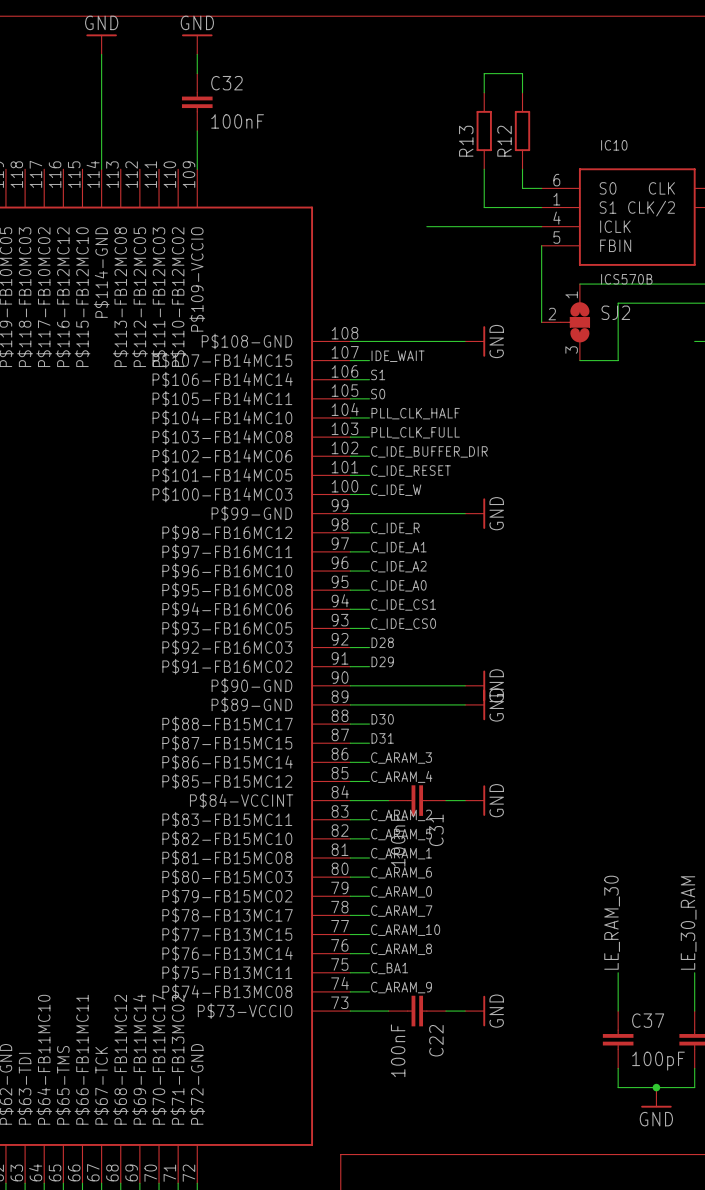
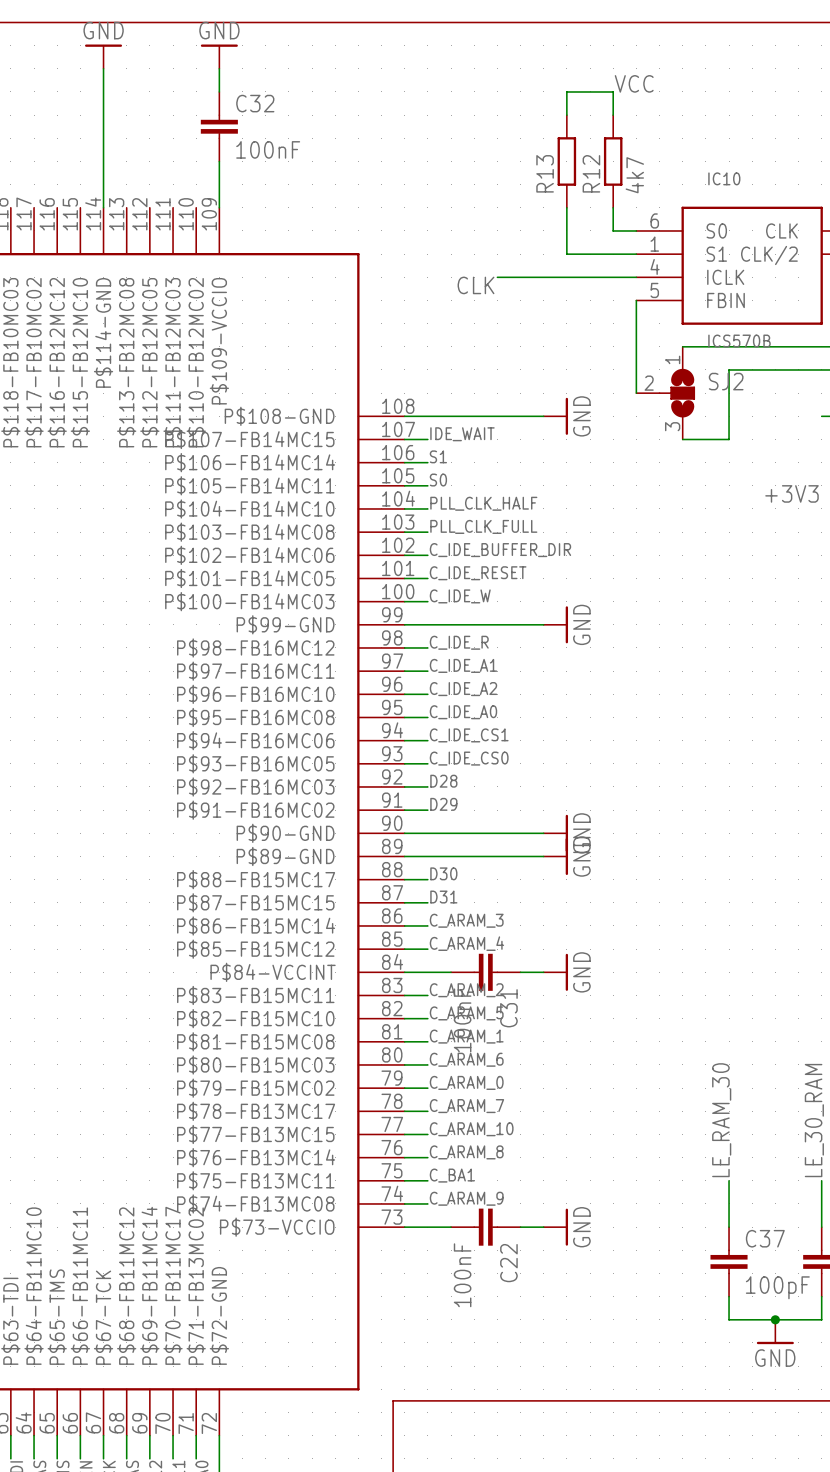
label: none -> VCC (634, 83)
R12 value: none -> 4k7 (634, 175)
label: none -> CLK (476, 285)
label: none -> +3V3 (791, 493)

